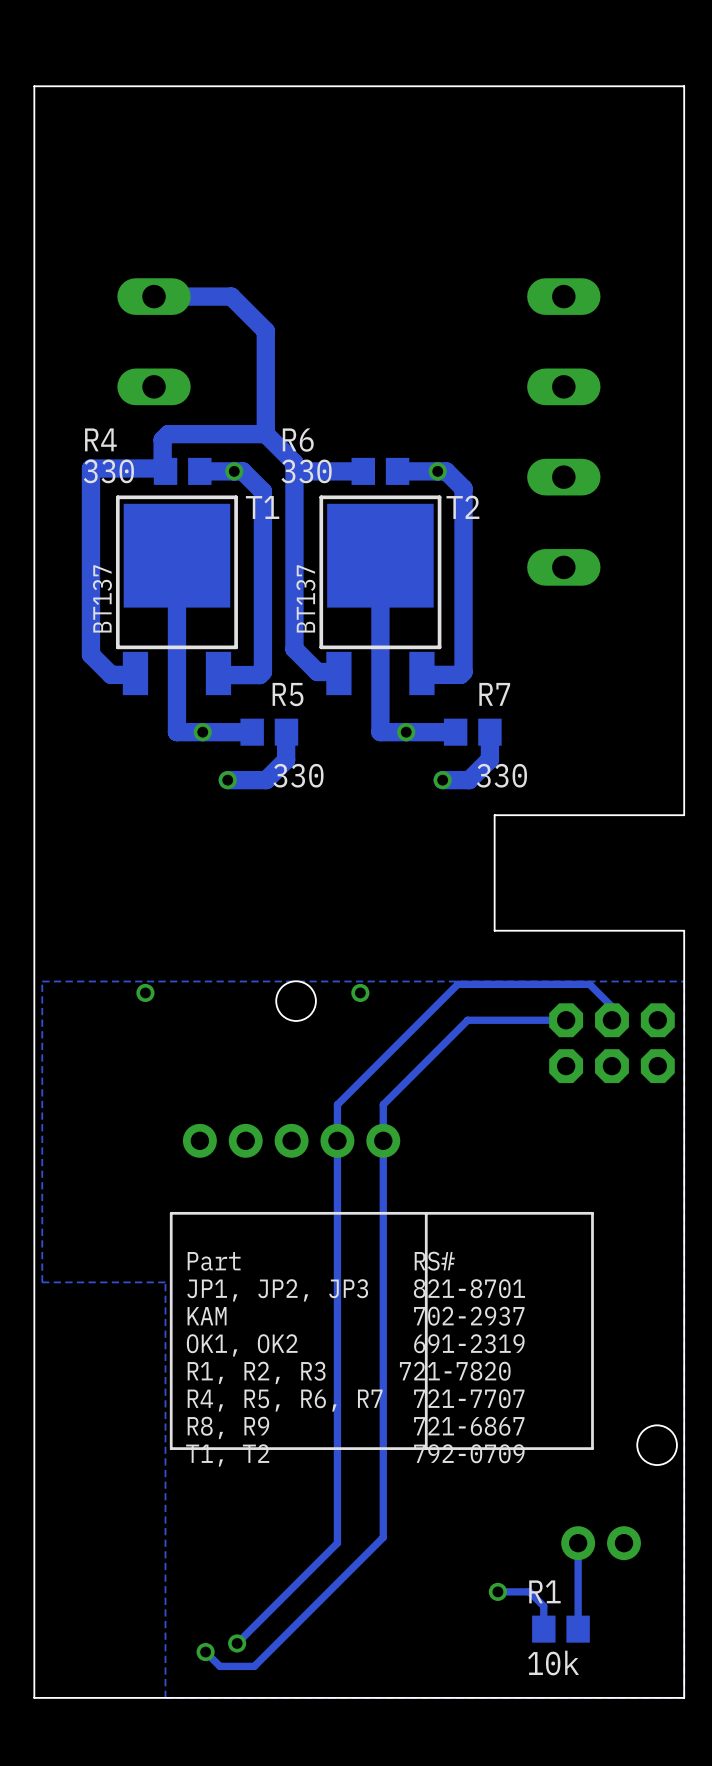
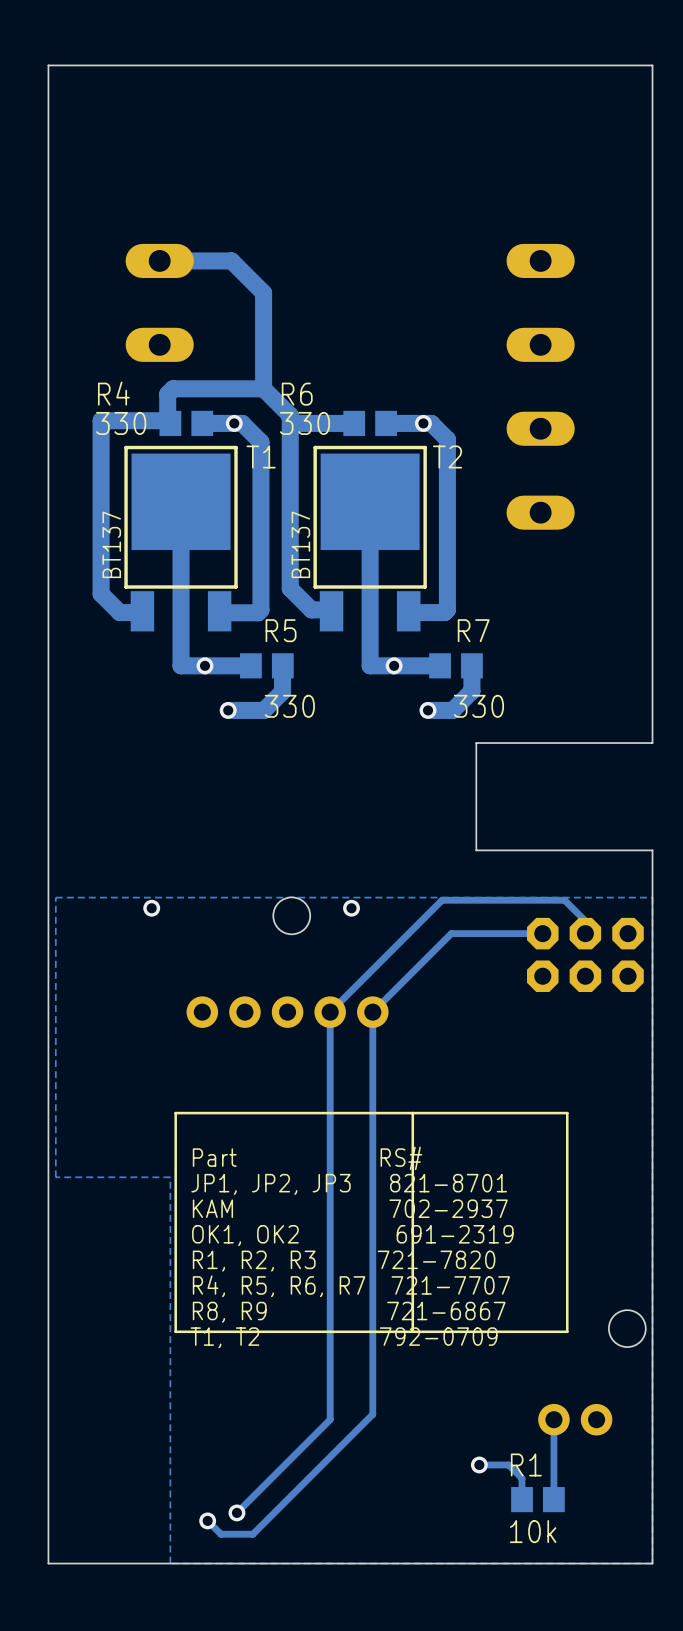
part position: (291, 1140) -> (287, 1012)

